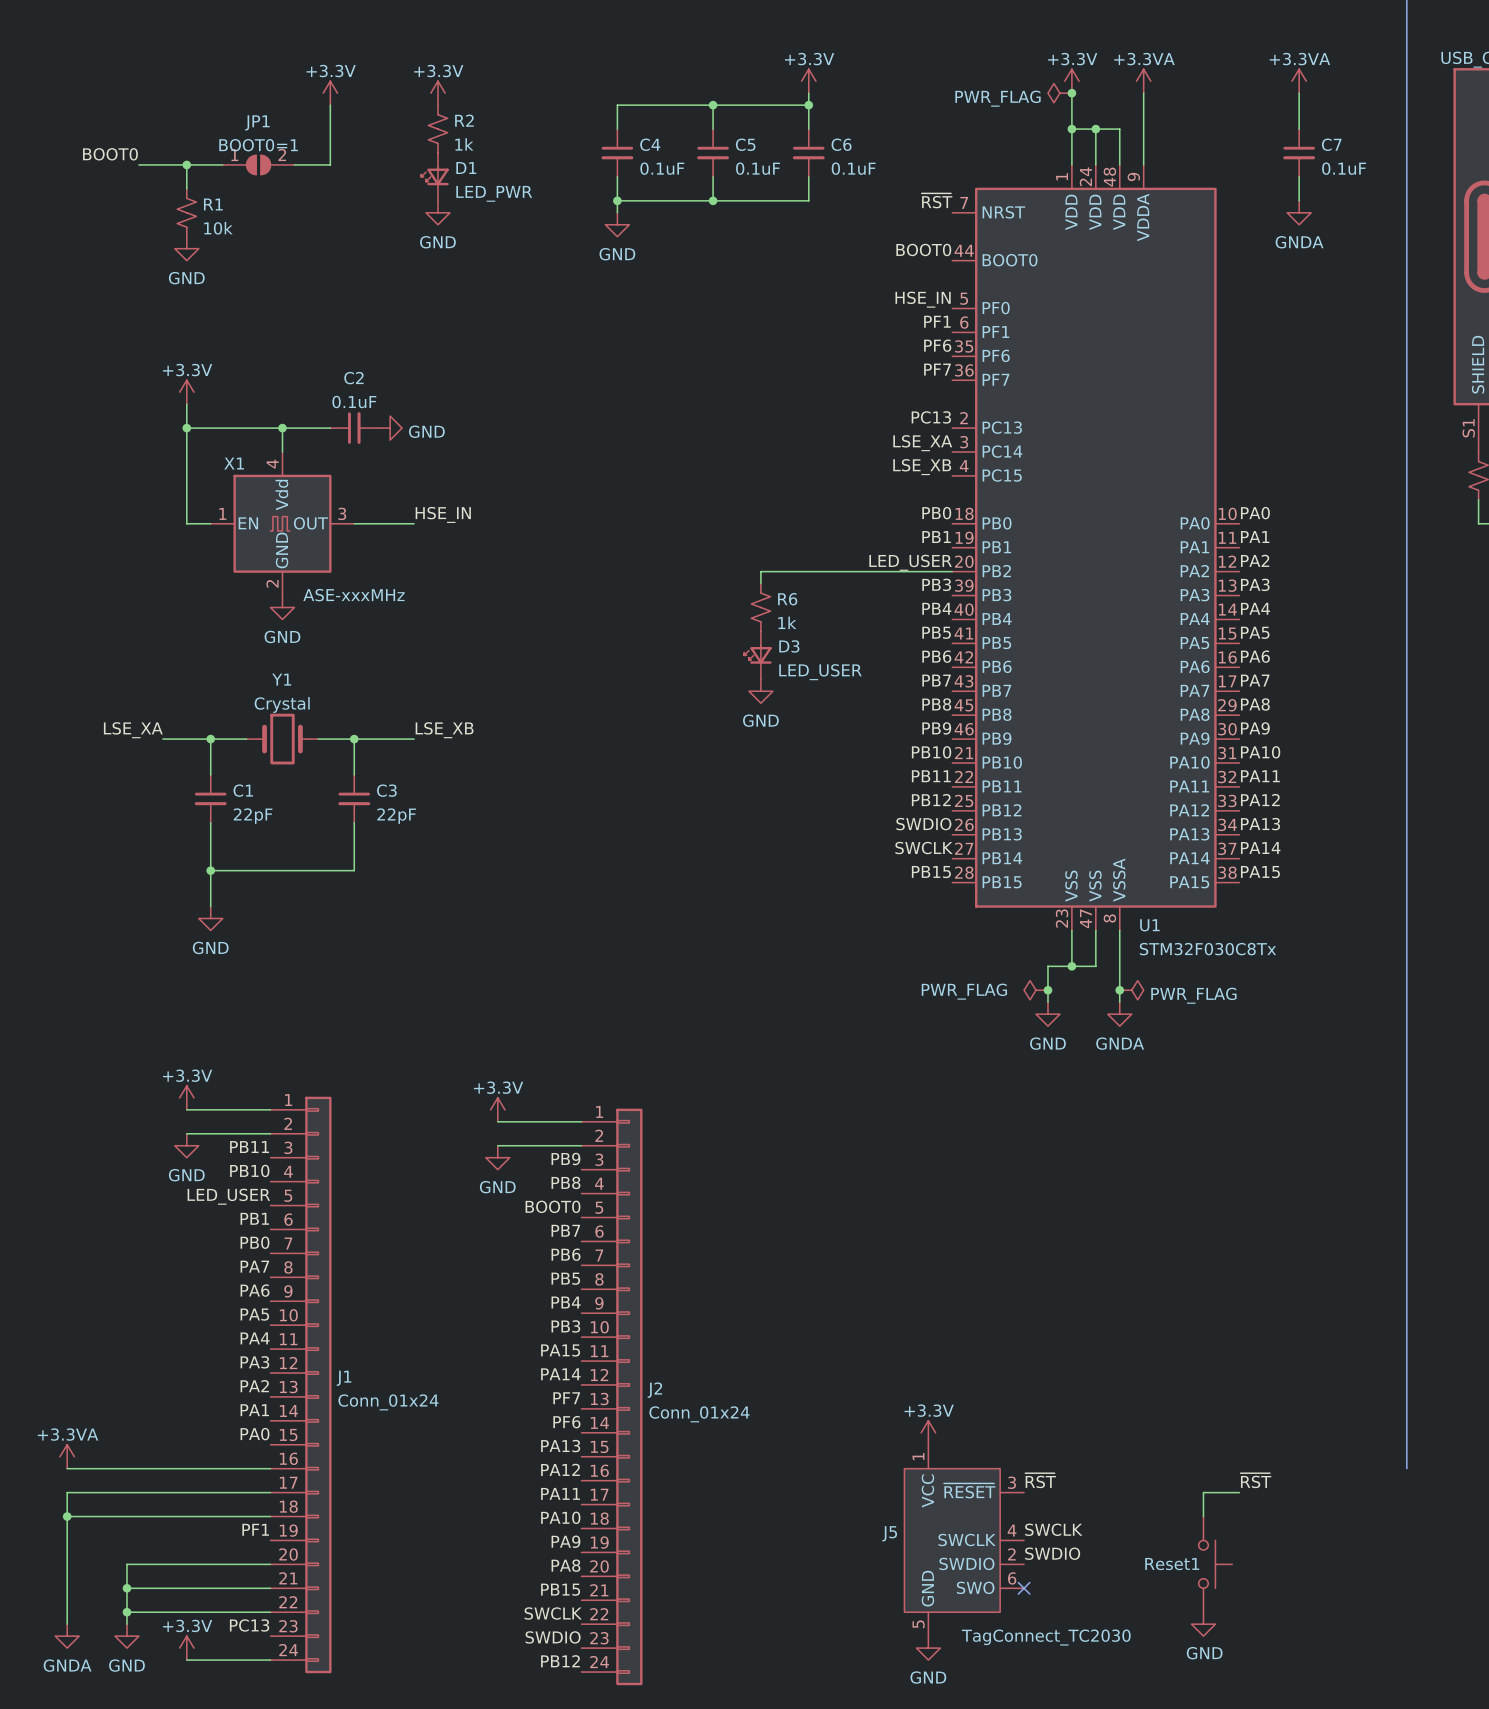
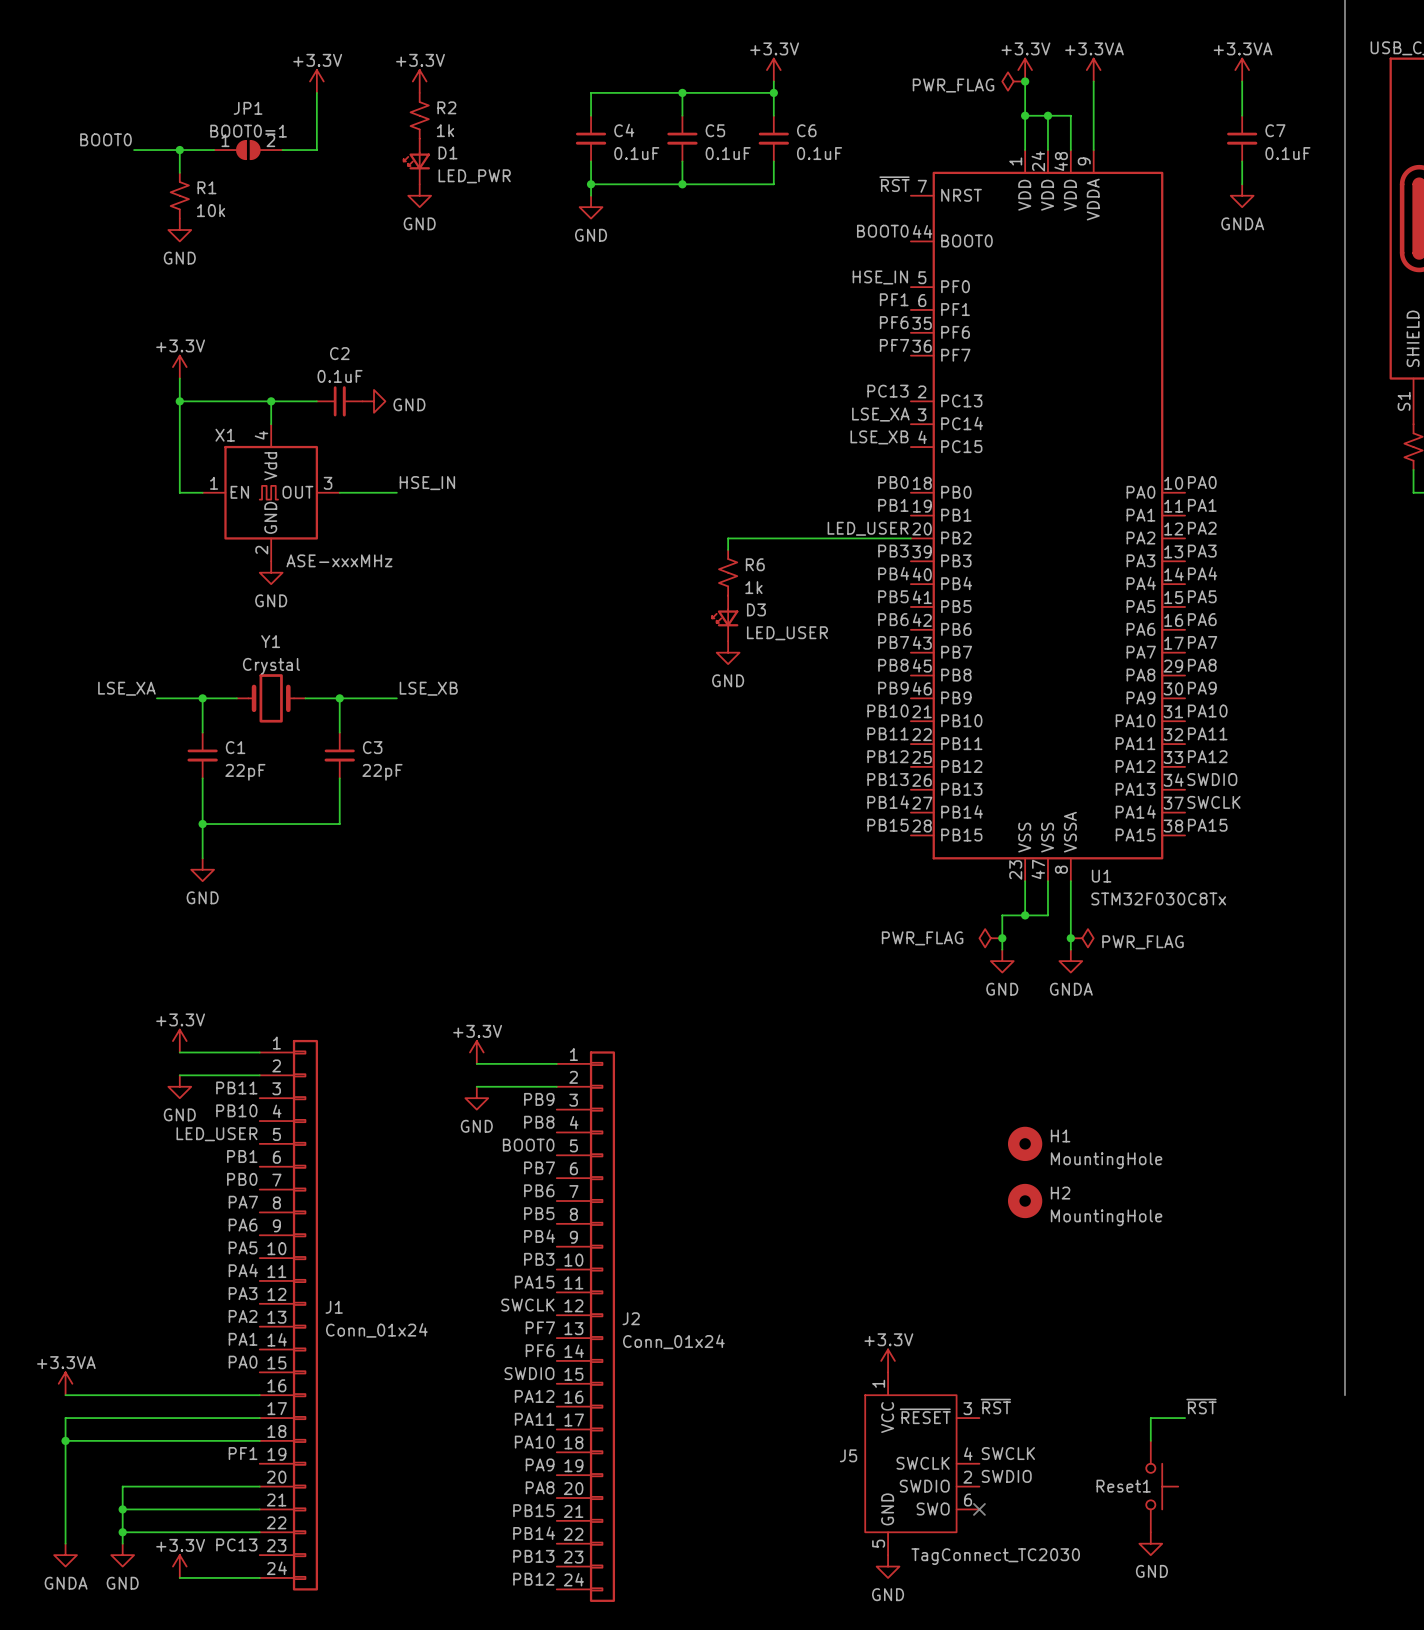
label: SWDIO (923, 824) -> PB13 (887, 779)
label: PA13 (1260, 824) -> SWDIO (1212, 779)
label: SWCLK (924, 848) -> PB14 (888, 802)
label: PA14 (1260, 848) -> SWCLK (1213, 802)
H1: none -> MountingHole (1025, 1143)
H2: none -> MountingHole (1025, 1201)
label: PA14 (560, 1374) -> SWCLK (527, 1305)
label: PA13 (560, 1446) -> SWDIO (529, 1373)
label: SWCLK (553, 1613) -> PB14 (534, 1533)
label: SWDIO (553, 1637) -> PB13 (533, 1556)

